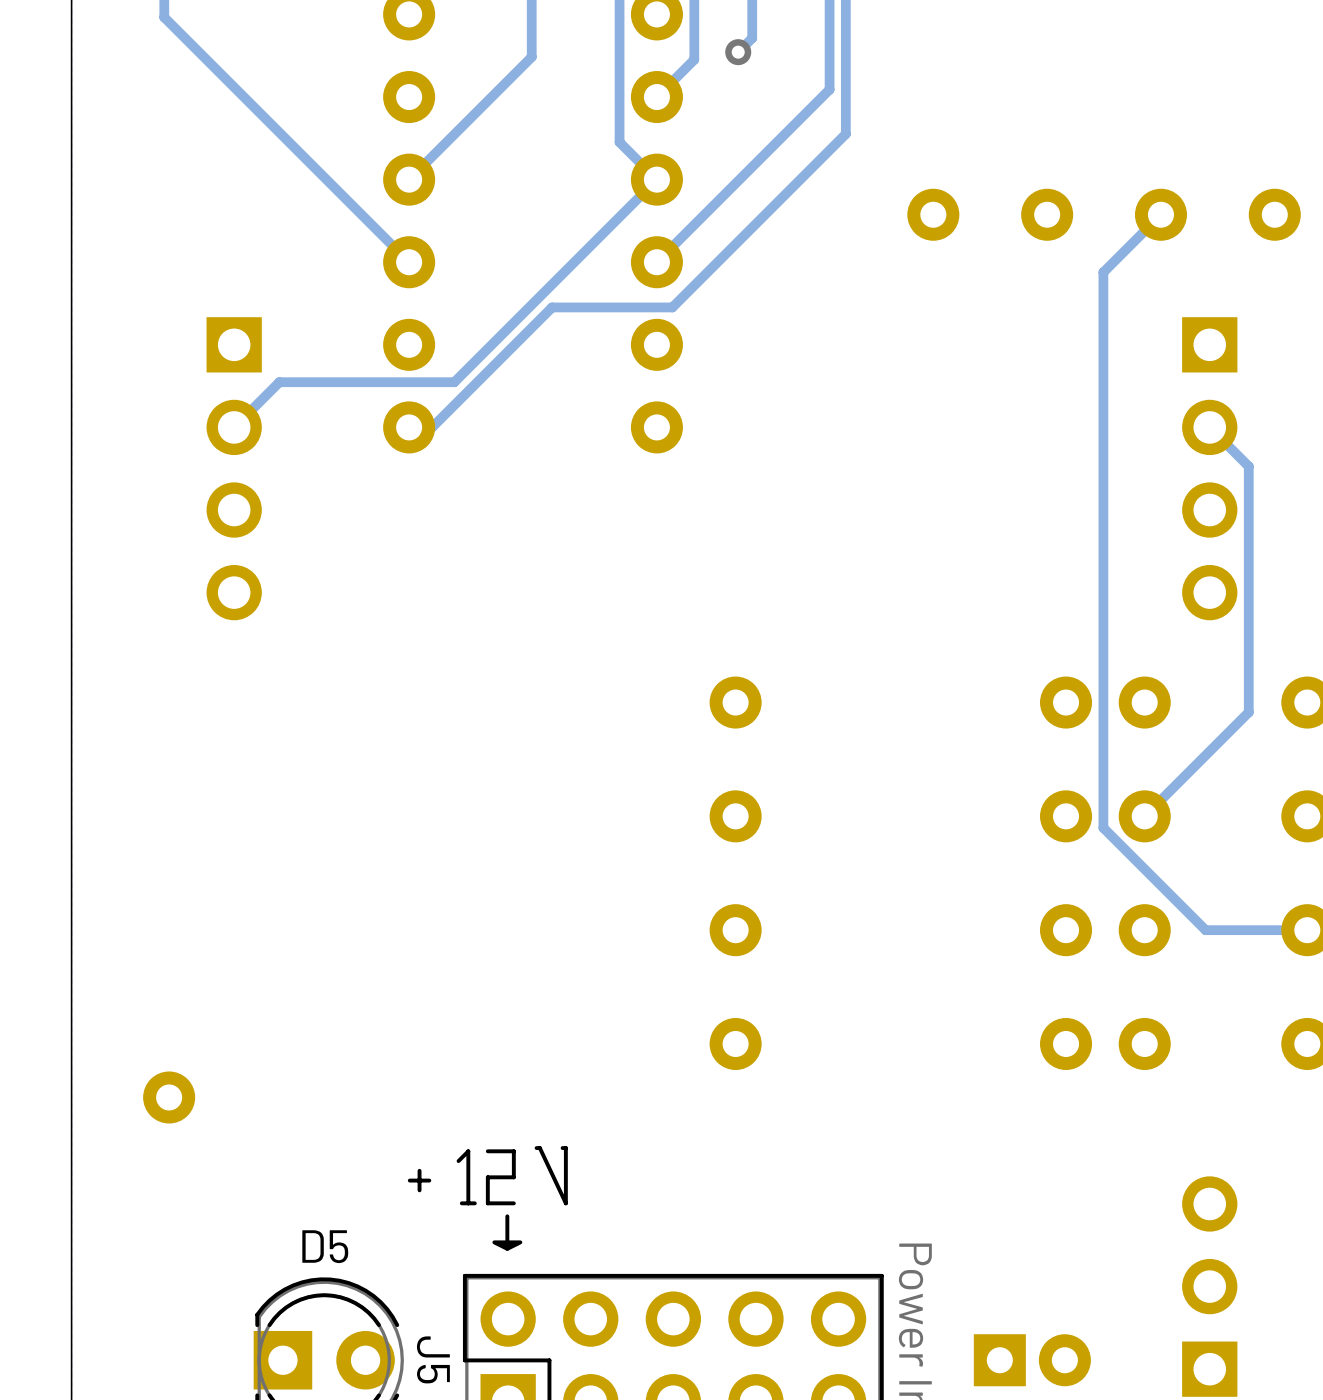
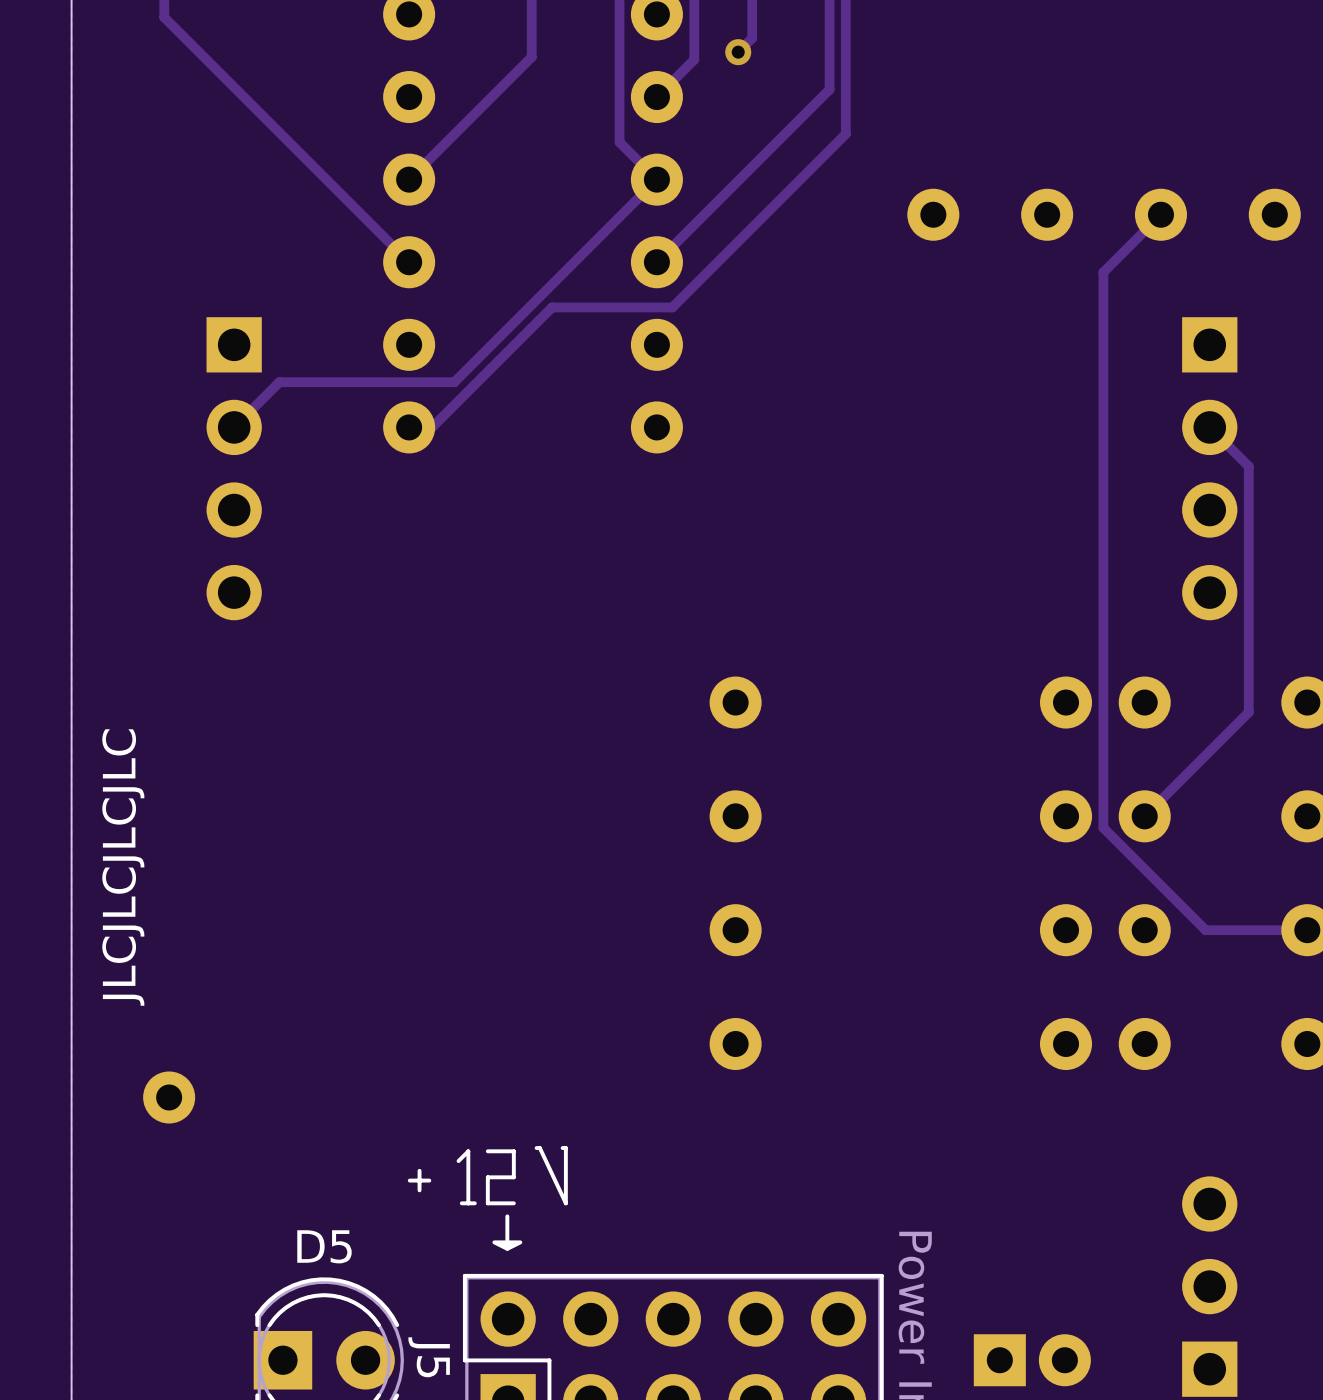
text: none -> JLCJLCJLCJLC (123, 867)

